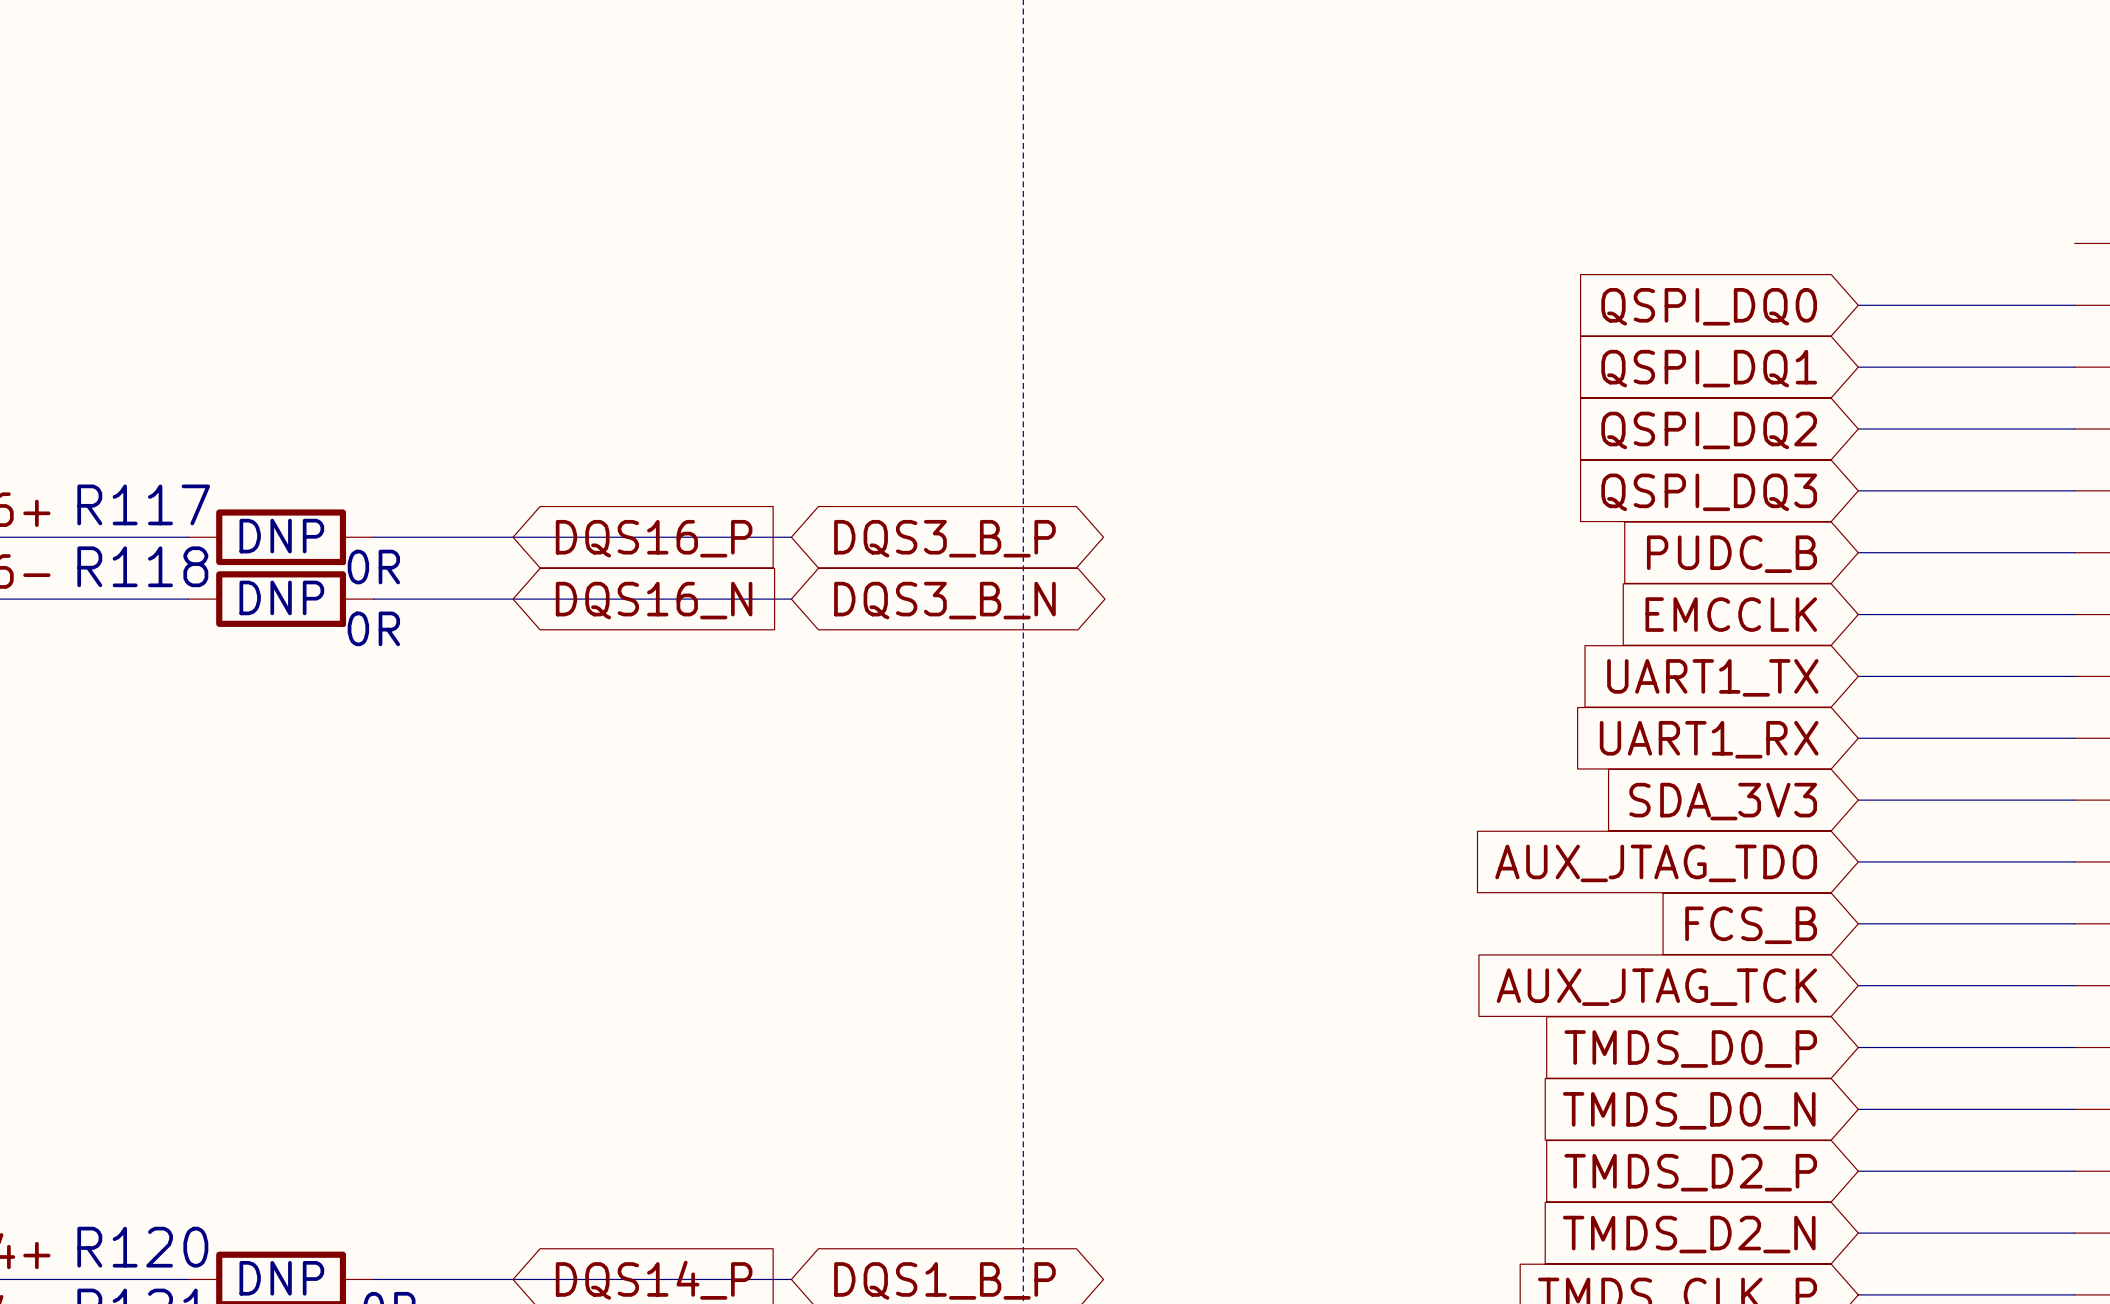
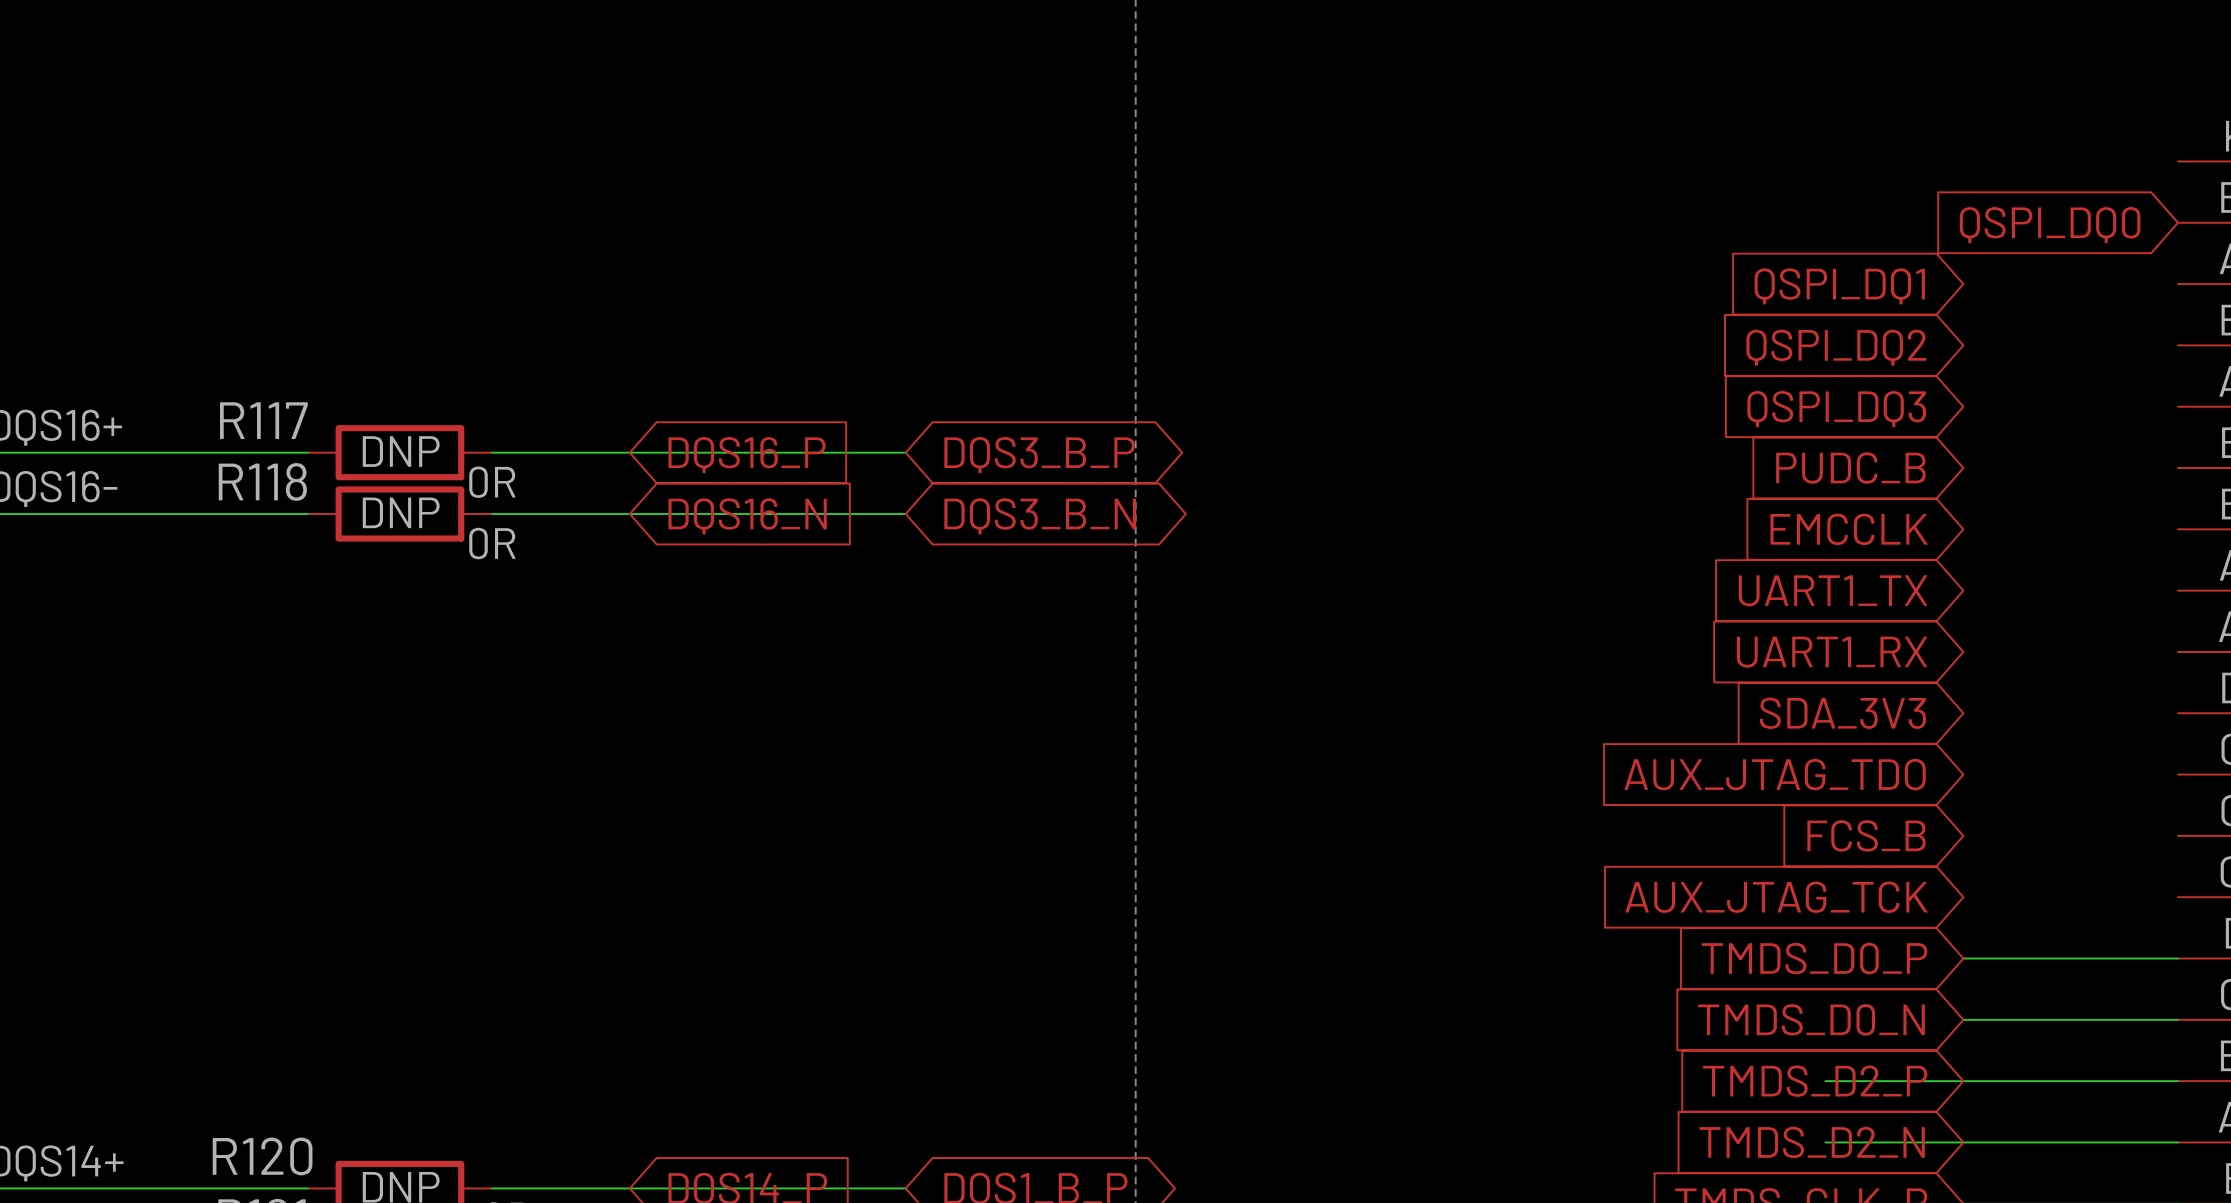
wire: (1858, 305) (2074, 305) -> none
global label position: QSPI_DQ0 (1709, 306) -> QSPI_DQ0 (2050, 225)
wire: (1858, 367) (2074, 367) -> none
wire: (1858, 429) (2074, 429) -> none
wire: (1858, 490) (2074, 490) -> none
wire: (1858, 552) (2074, 552) -> none
wire: (1858, 614) (2074, 614) -> none
wire: (1858, 676) (2074, 676) -> none
wire: (1858, 738) (2074, 738) -> none
wire: (1858, 800) (2074, 800) -> none
wire: (1858, 861) (2074, 861) -> none
wire: (1858, 923) (2074, 923) -> none
wire: (1858, 985) (2074, 985) -> none
wire: none -> (1825, 1081) (1963, 1081)
wire: none -> (1825, 1142) (1963, 1142)

